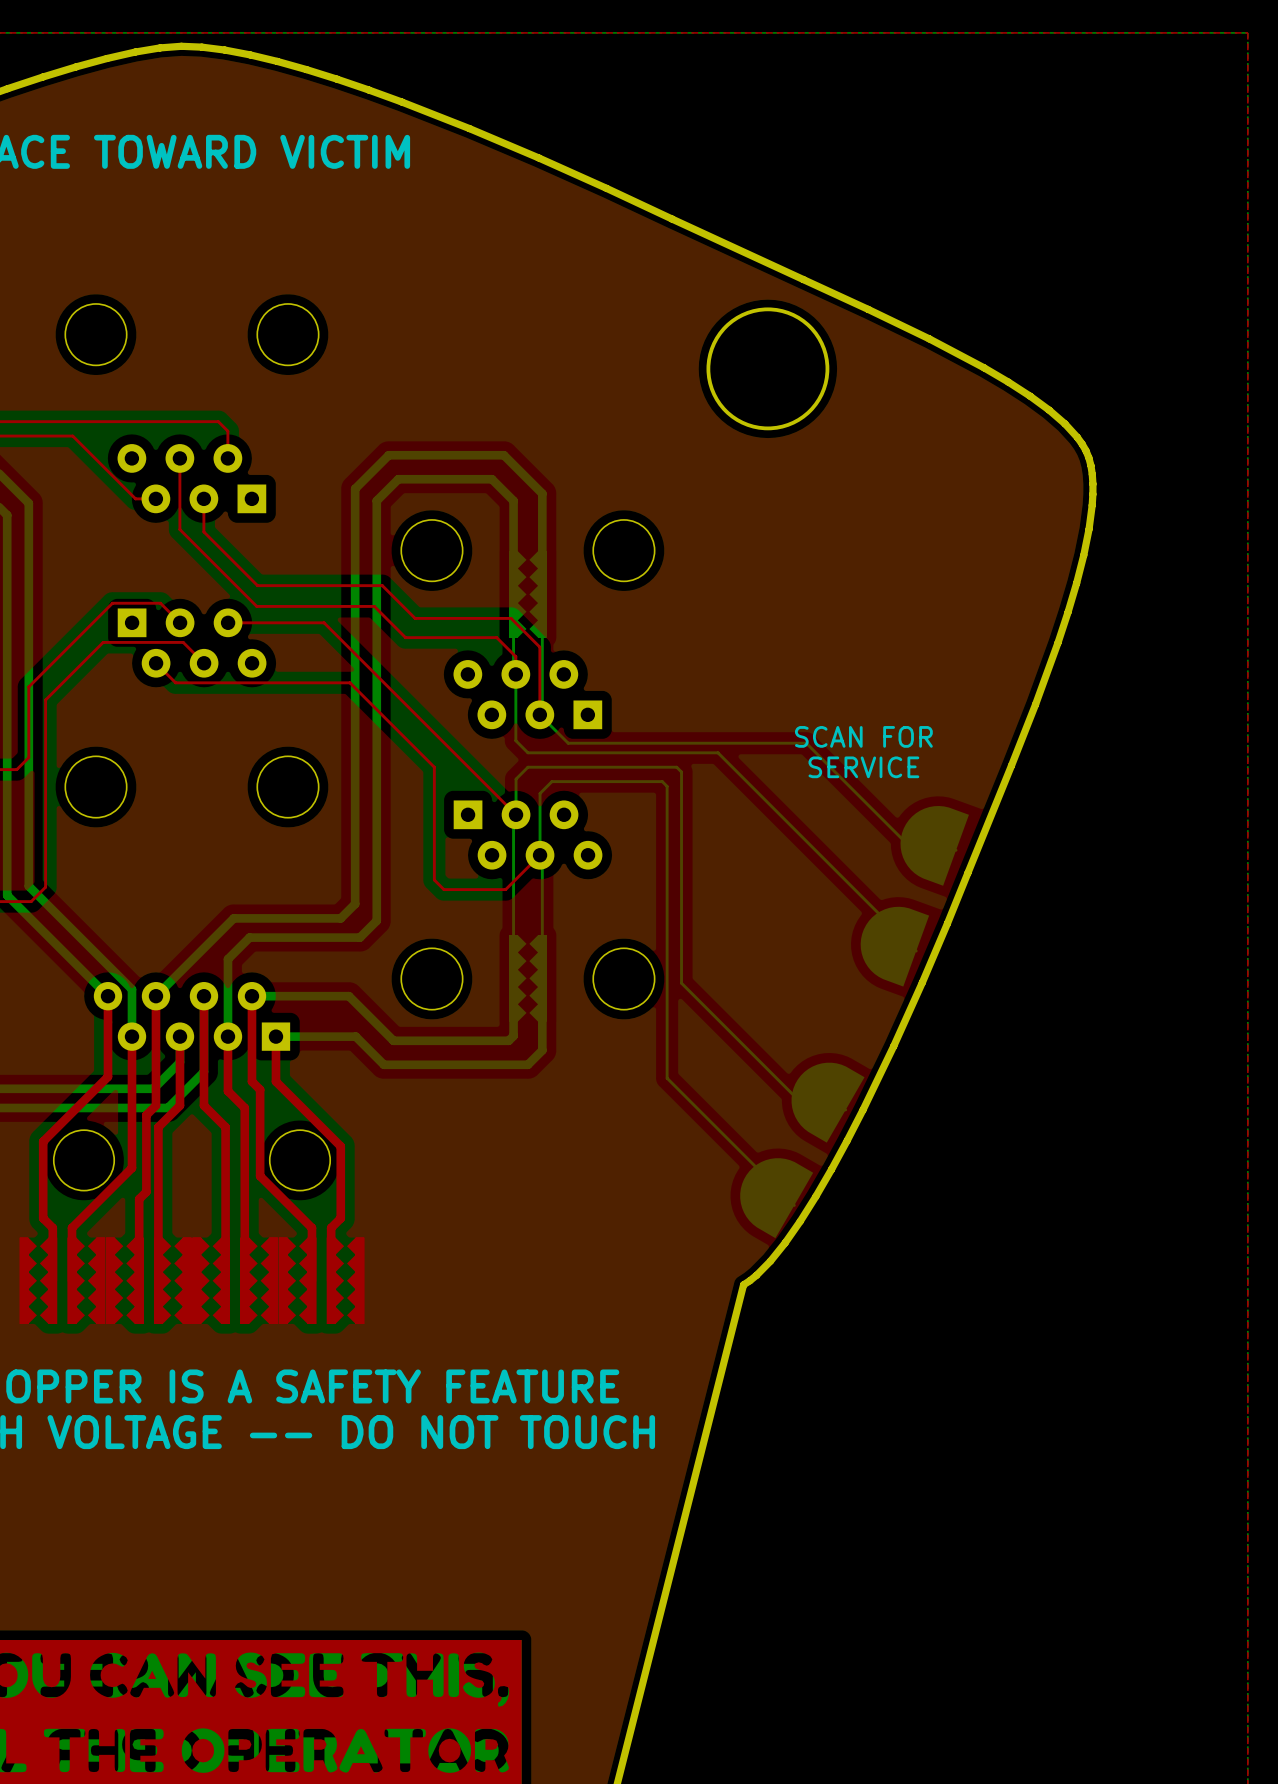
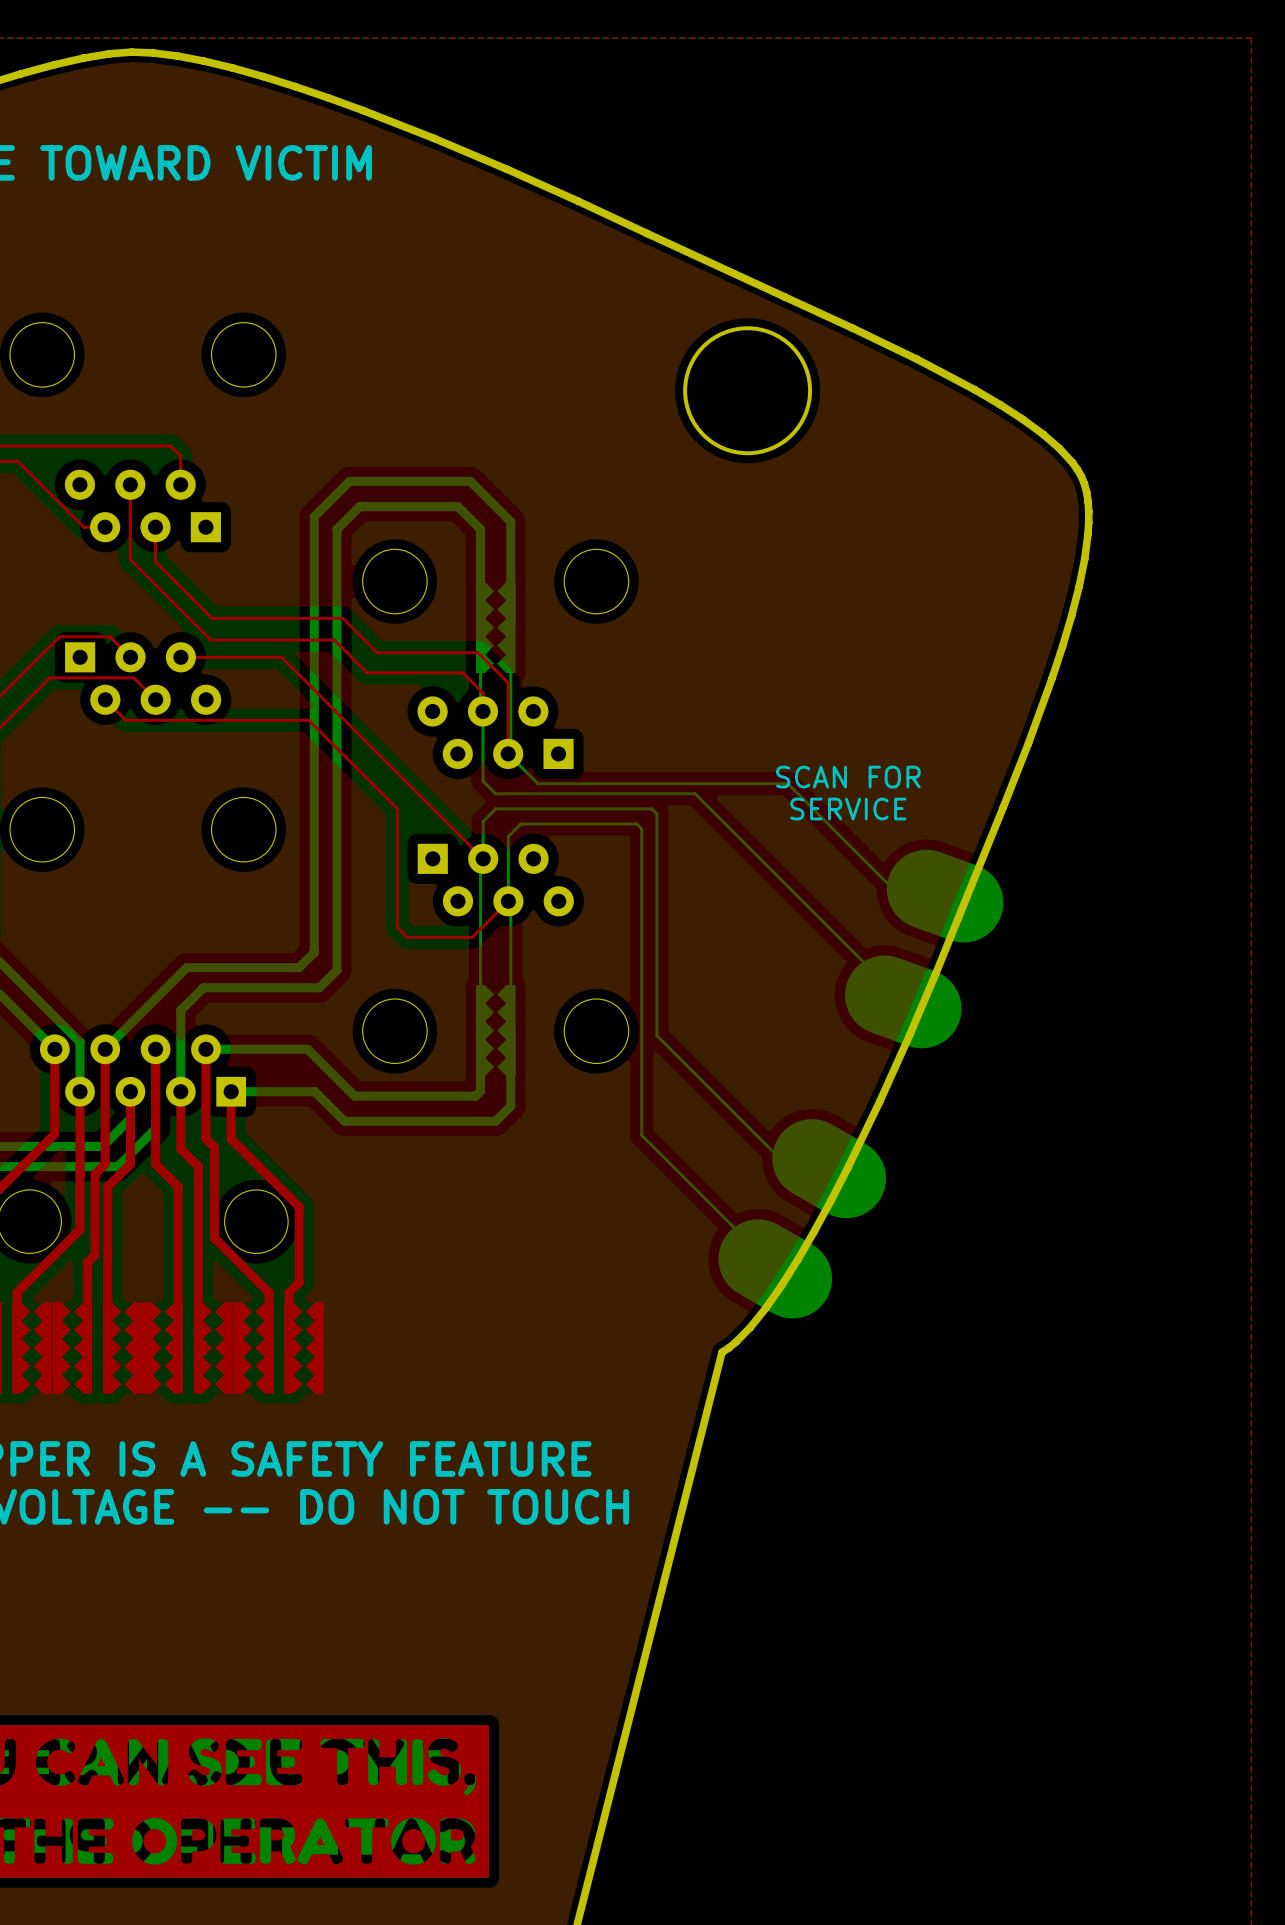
part: (934, 845) -> none
part: none -> (945, 896)
part: (894, 946) -> none
part: none -> (903, 1001)
part: (828, 1102) -> none
part: none -> (829, 1168)
part: (776, 1198) -> none
part: none -> (775, 1268)

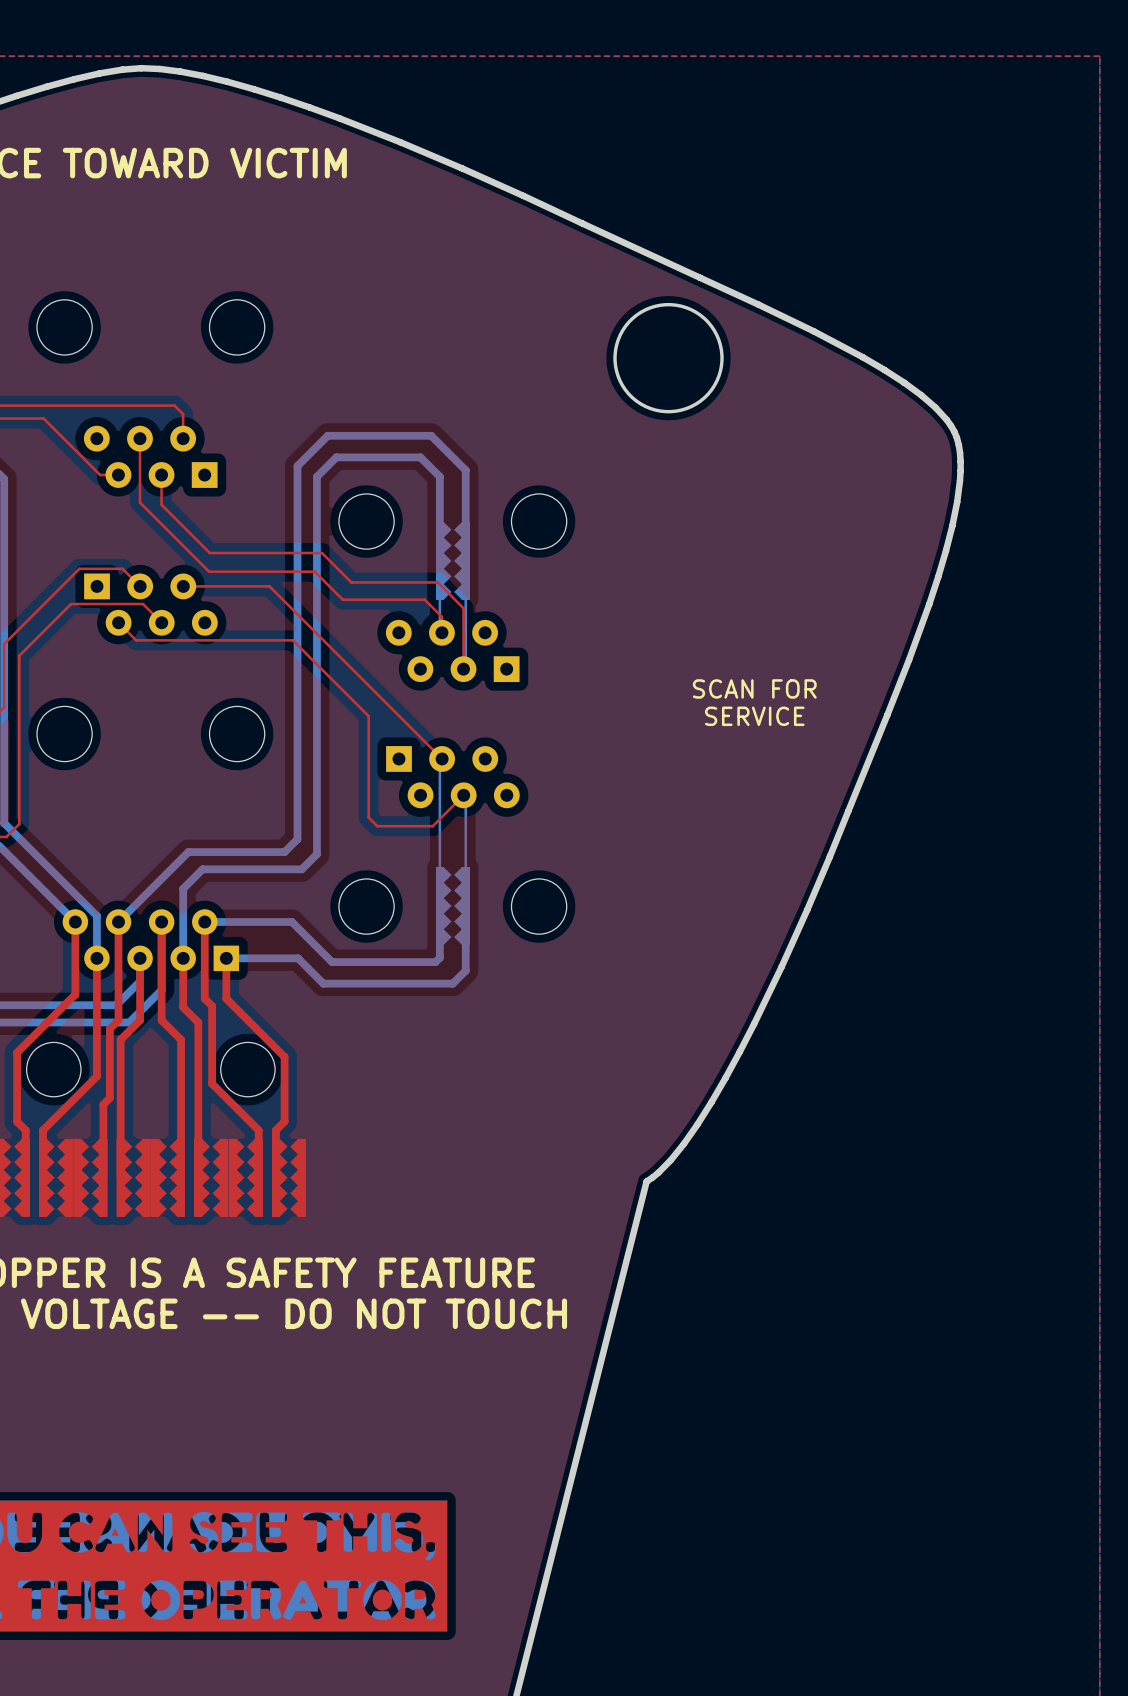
bottom track: (482, 711) (482, 781) (495, 793) (695, 793) (903, 1001) -> none
bottom track: (508, 753) (537, 783) (787, 783) (900, 896) (945, 896) -> none
bottom track: (483, 858) (483, 821) (495, 808) (651, 808) (656, 813) (656, 1035) (789, 1168) (829, 1168) -> none
part: (945, 896) -> none
bottom track: (508, 901) (508, 836) (520, 824) (636, 824) (641, 829) (641, 1135) (775, 1268) -> none
part: (903, 1001) -> none
part: (829, 1168) -> none
part: (775, 1268) -> none

